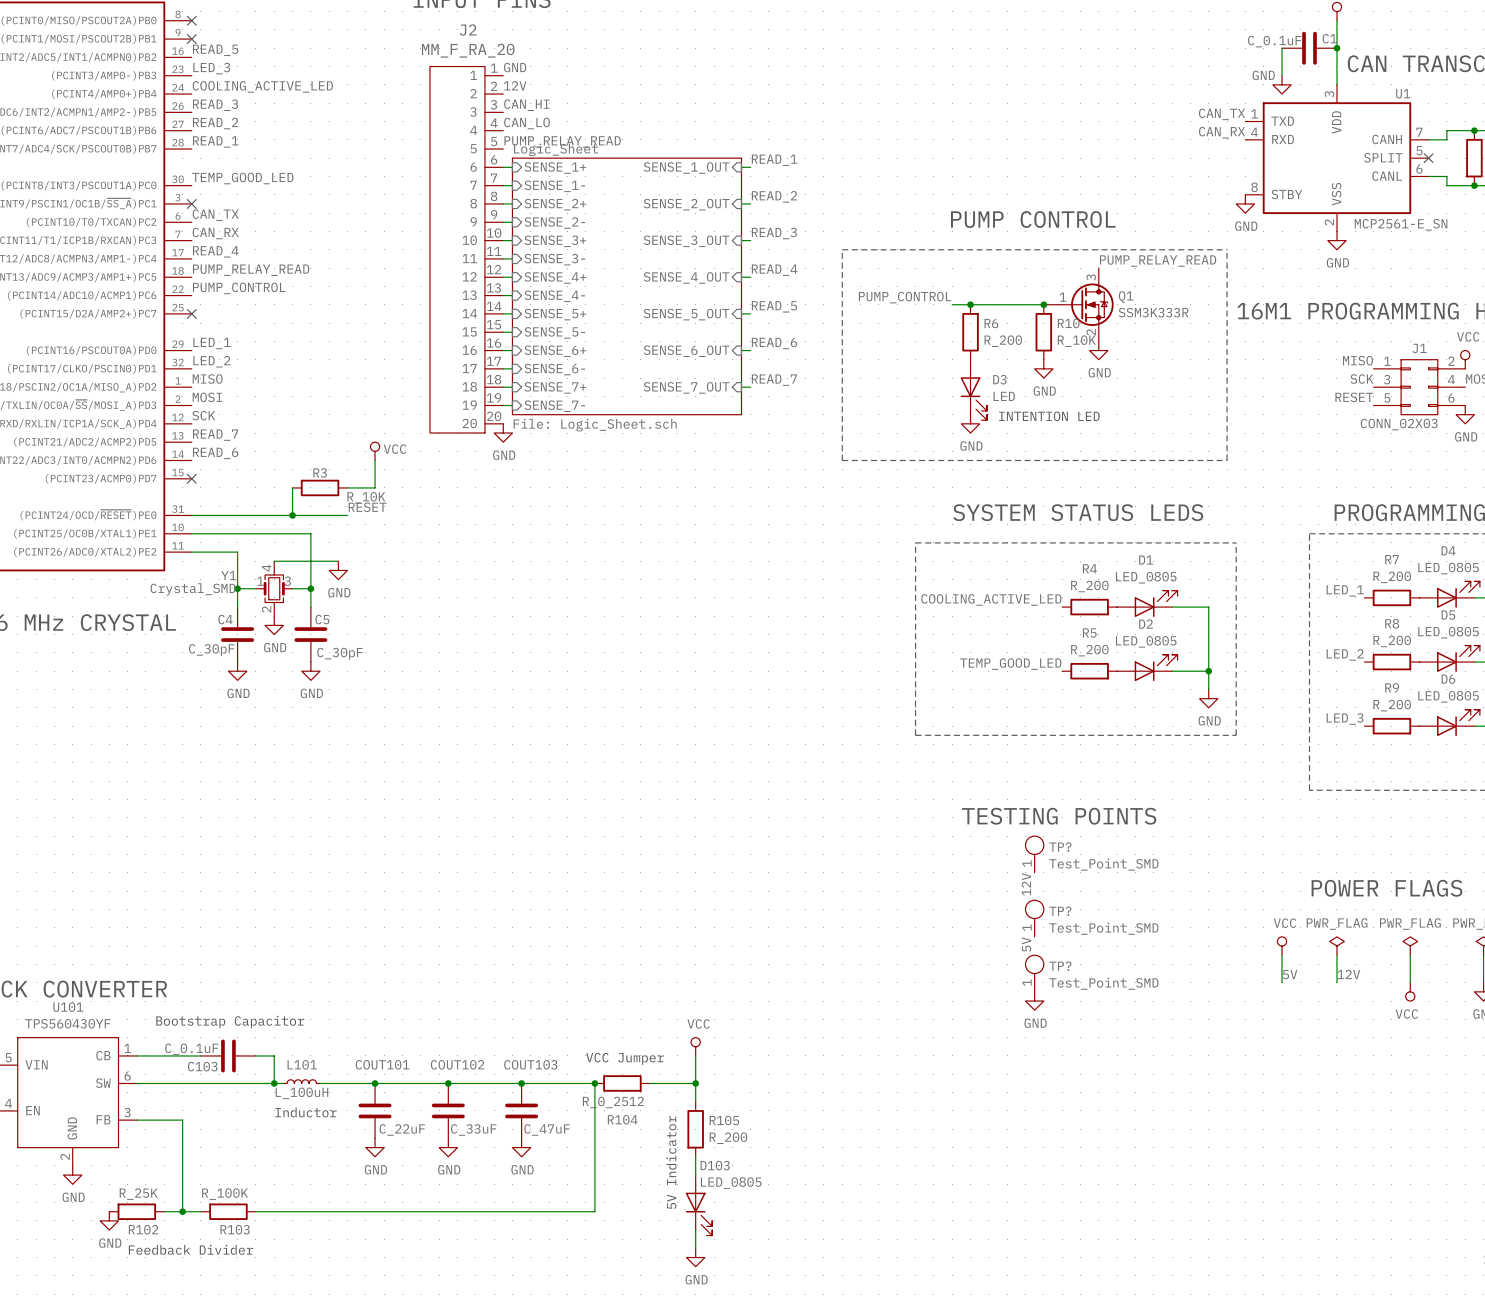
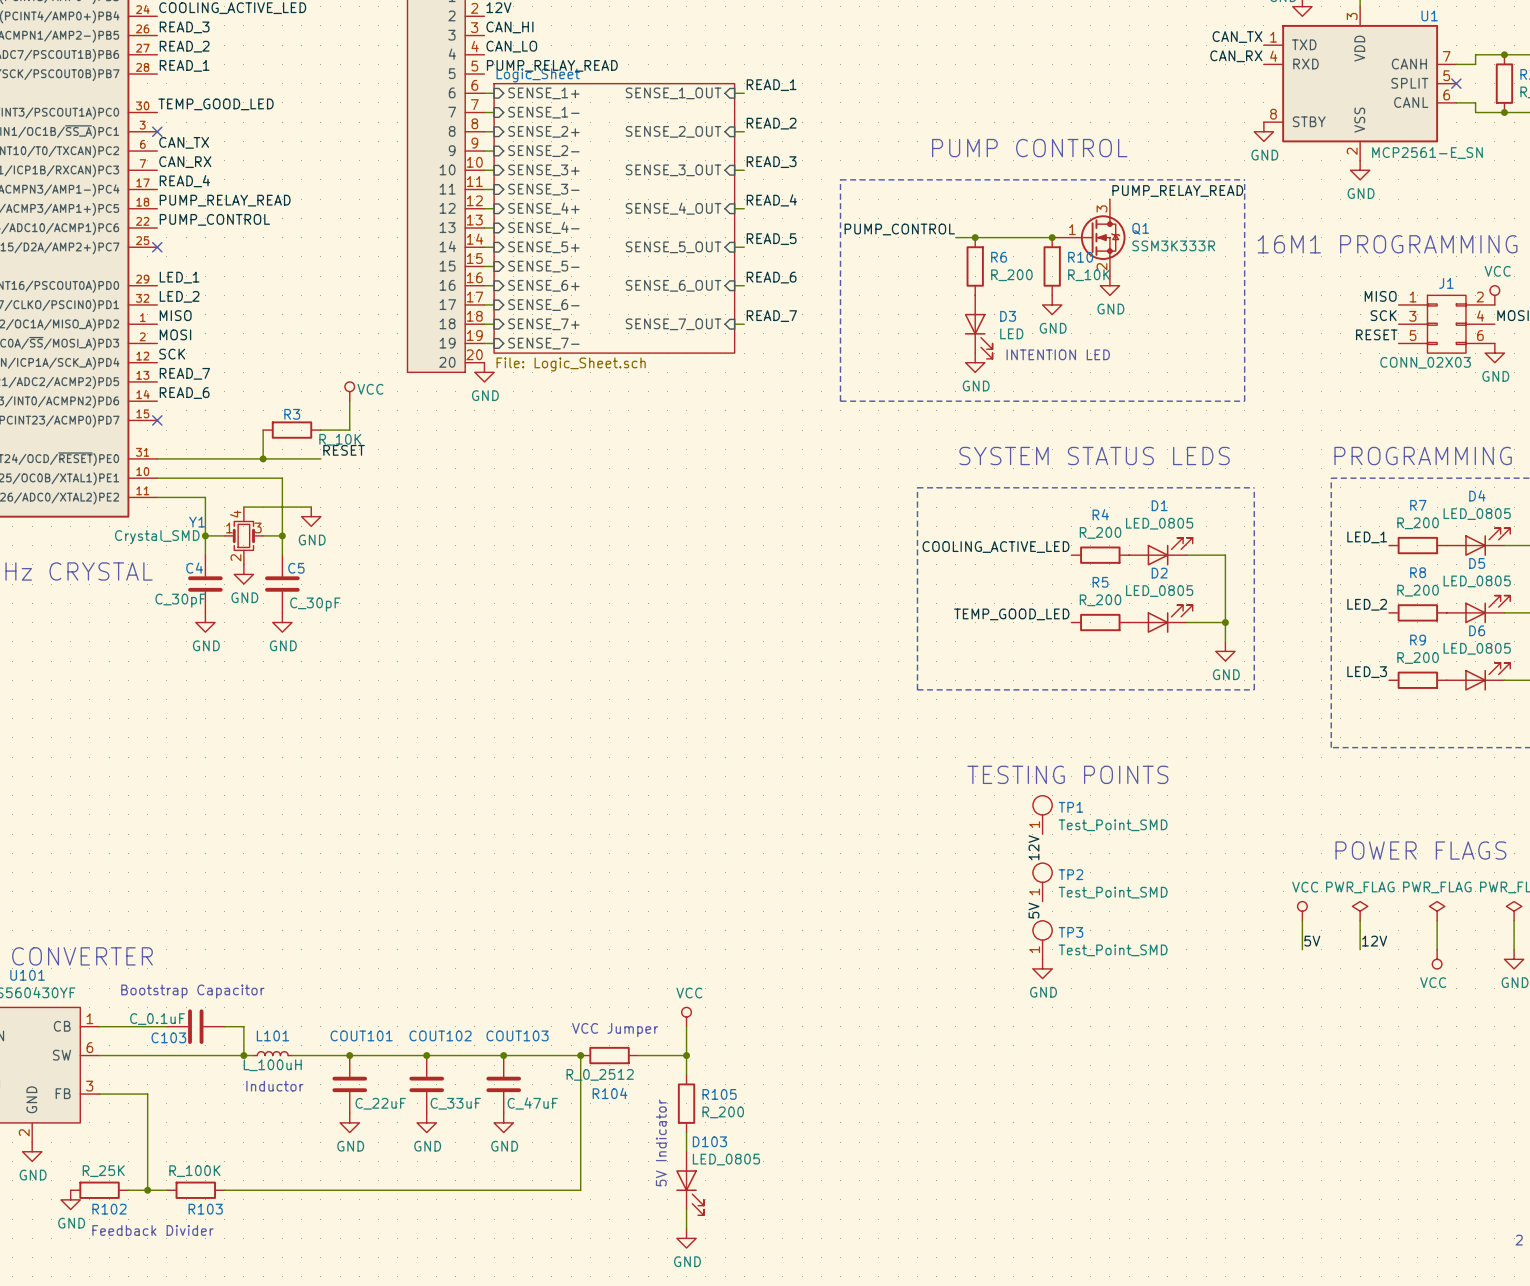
TP? name: TP? (1060, 847) -> TP1 (1070, 807)
TP? name: TP? (1060, 911) -> TP2 (1070, 874)
TP? name: TP? (1060, 966) -> TP3 (1070, 932)

